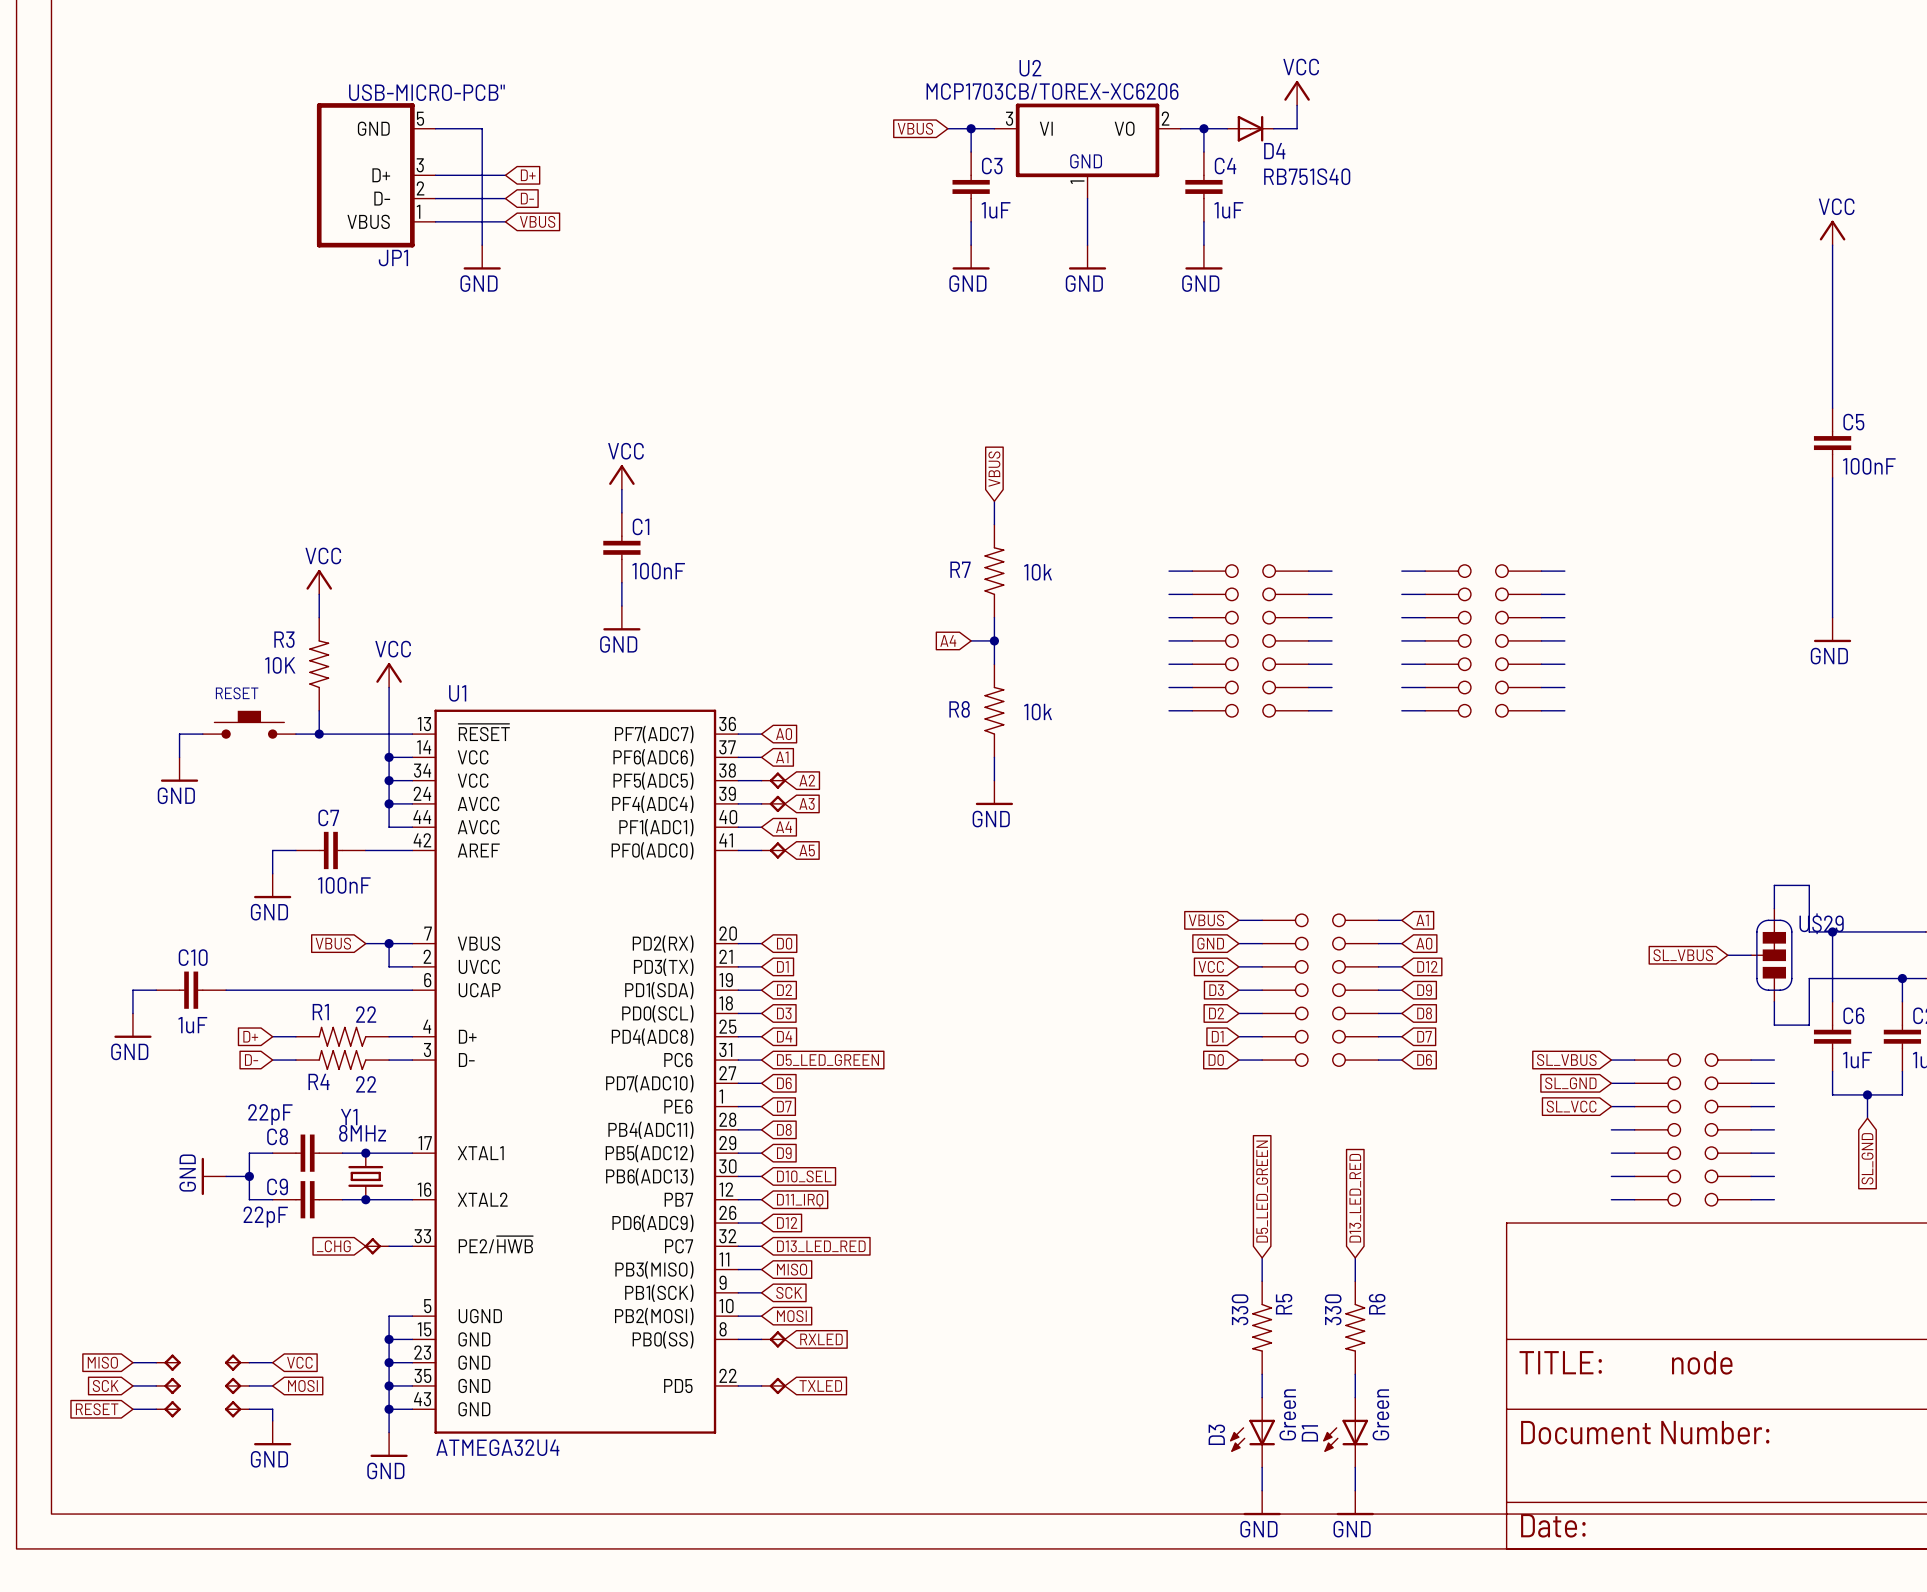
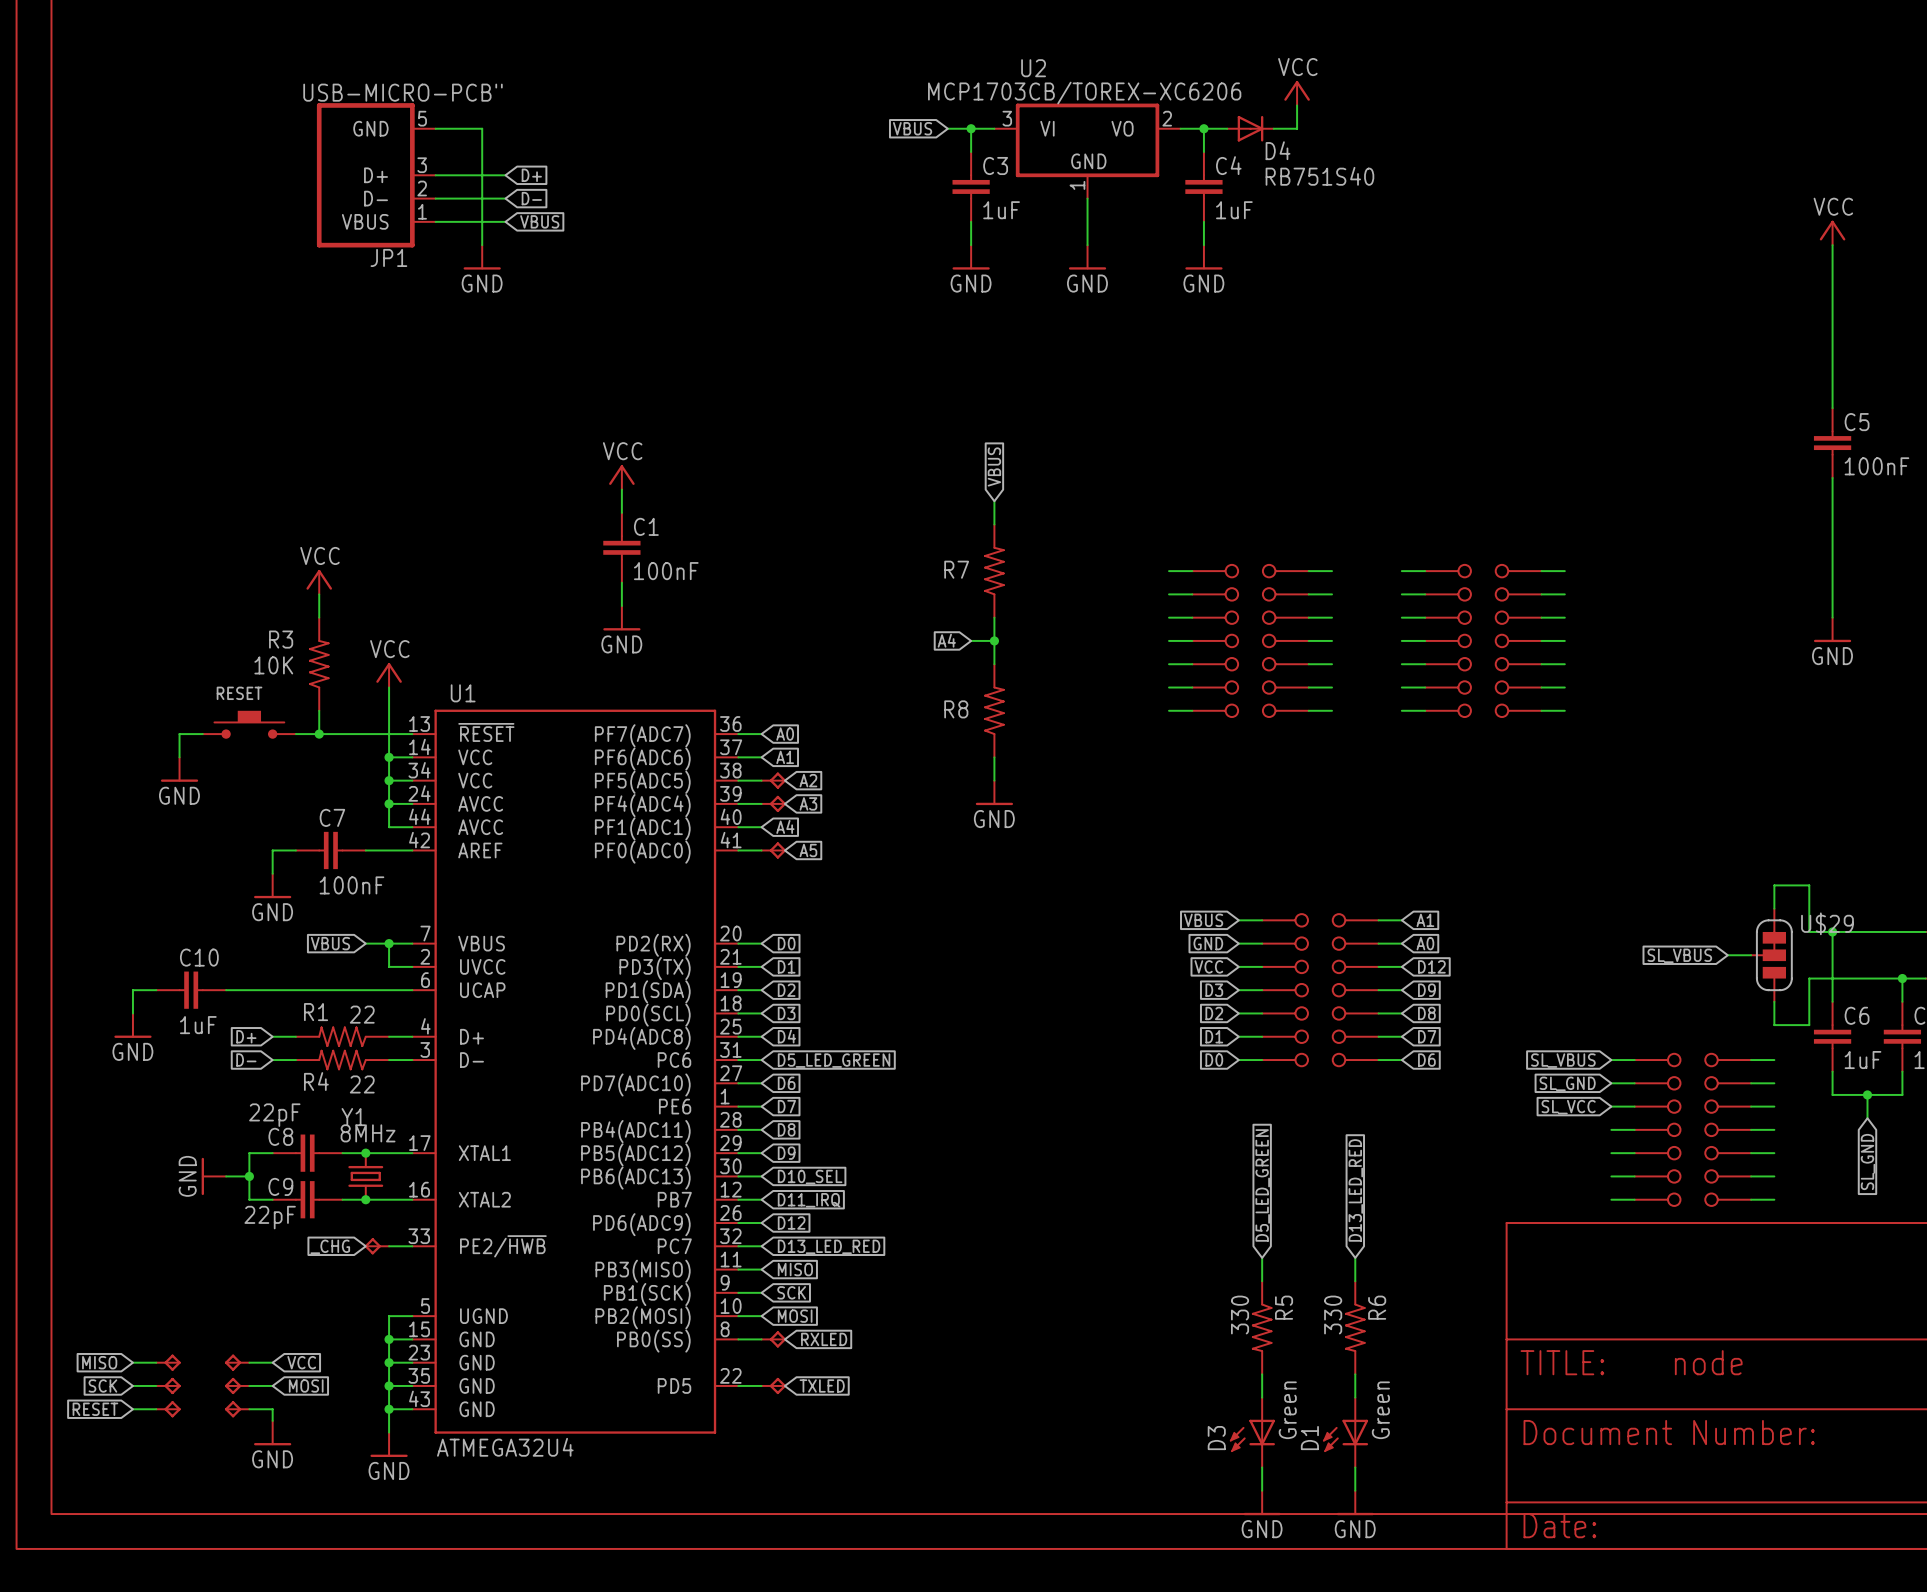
R7 value: 10k (1038, 572) -> none
R8 value: 10k (1038, 711) -> none

